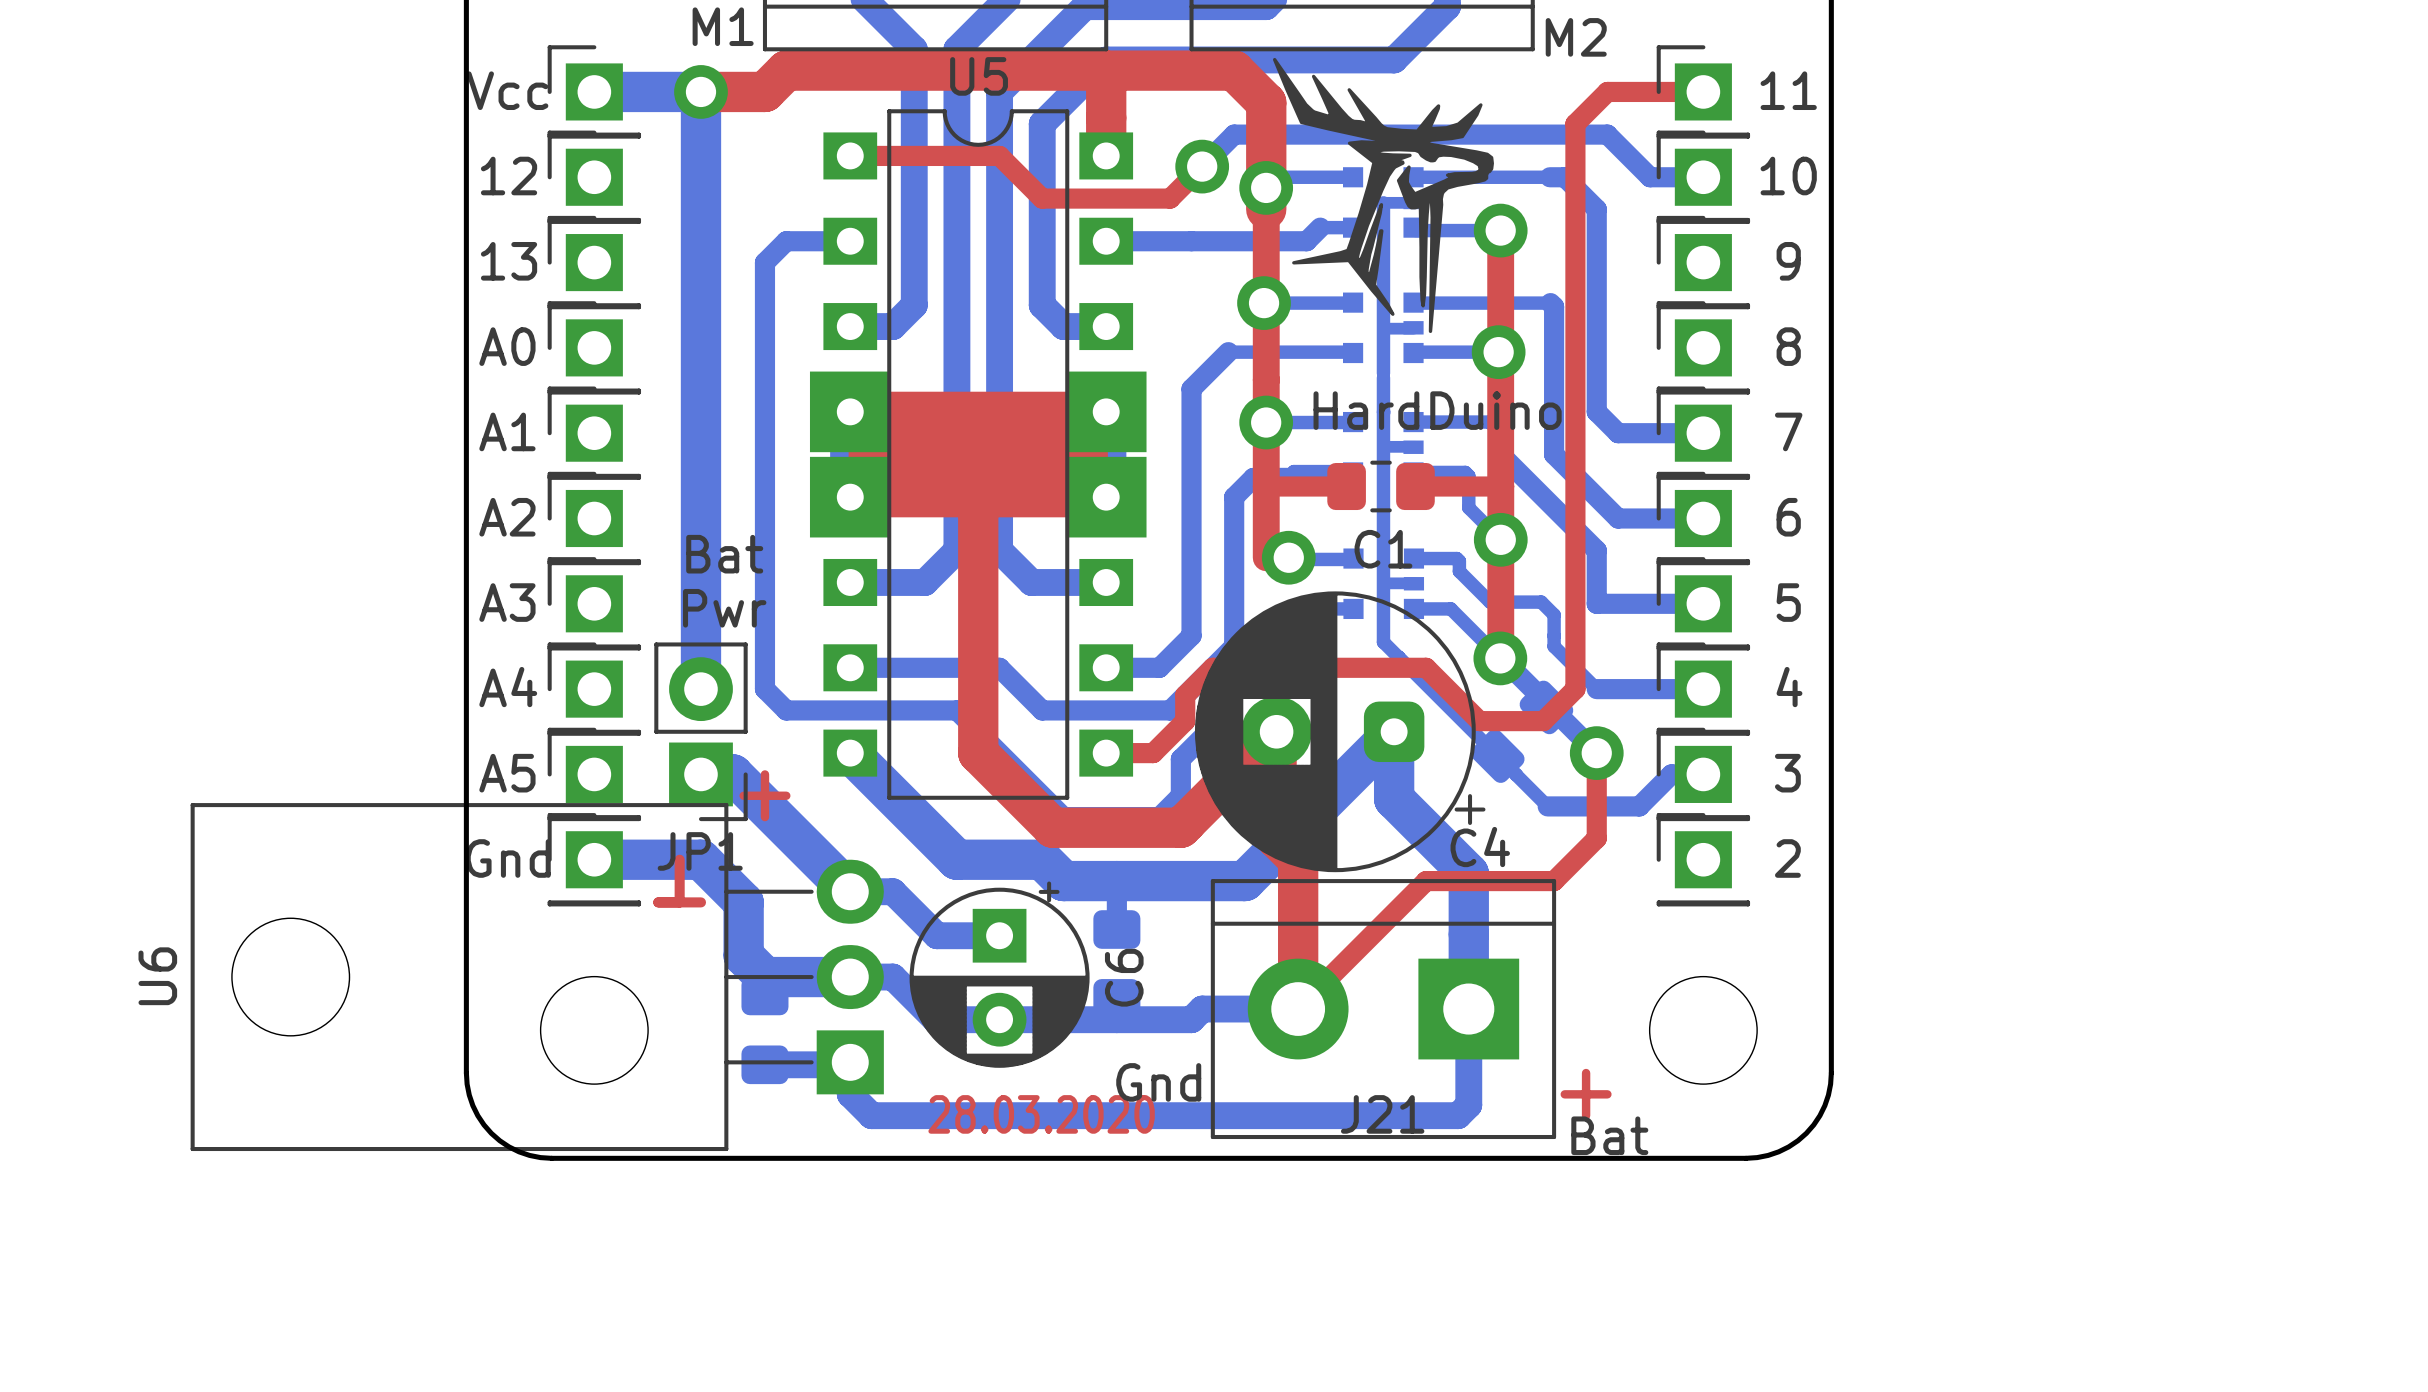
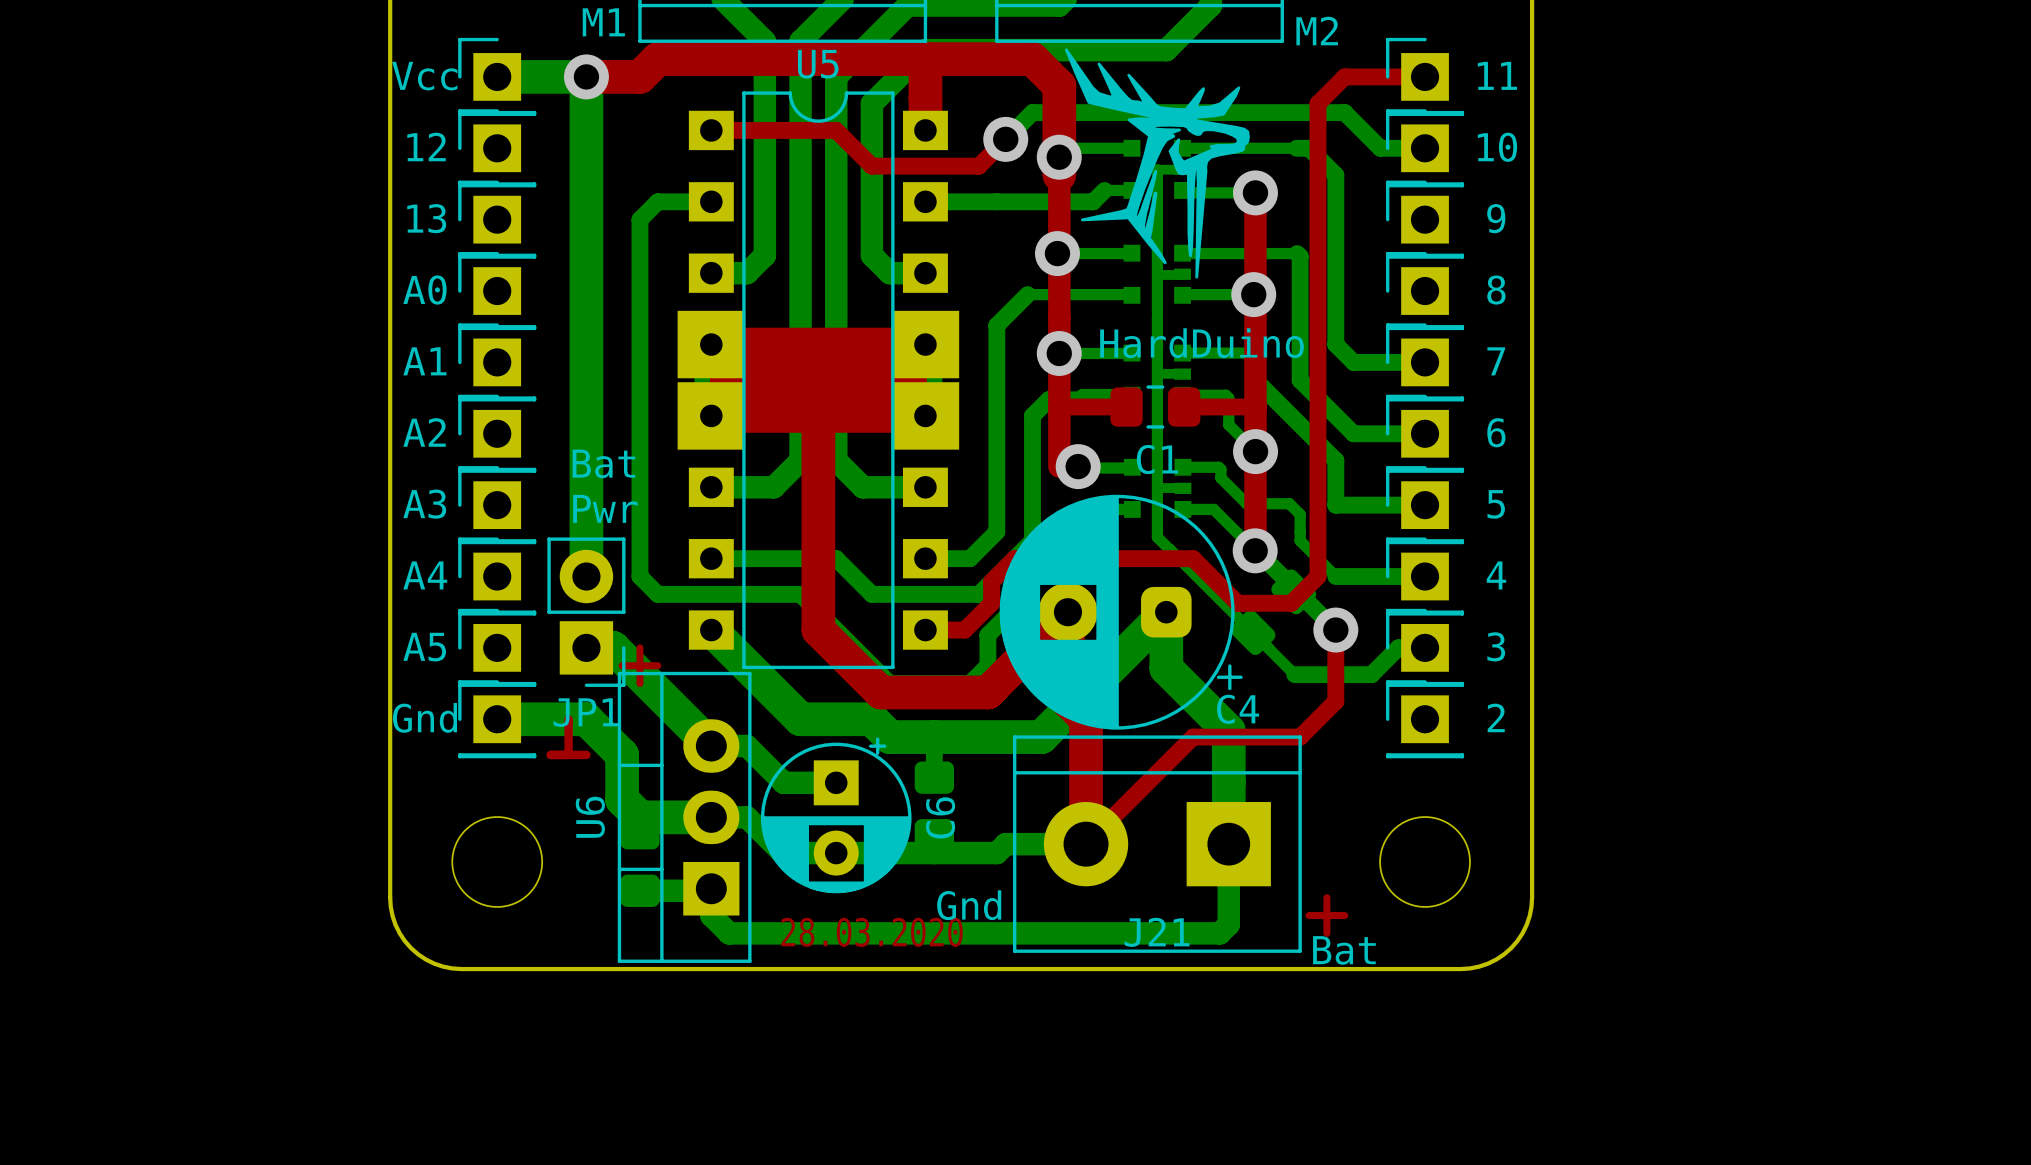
U6 footprint: [190, 803, 884, 1152] -> [617, 671, 752, 963]
U6 name position: U6 (157, 976) -> U6 (590, 817)

